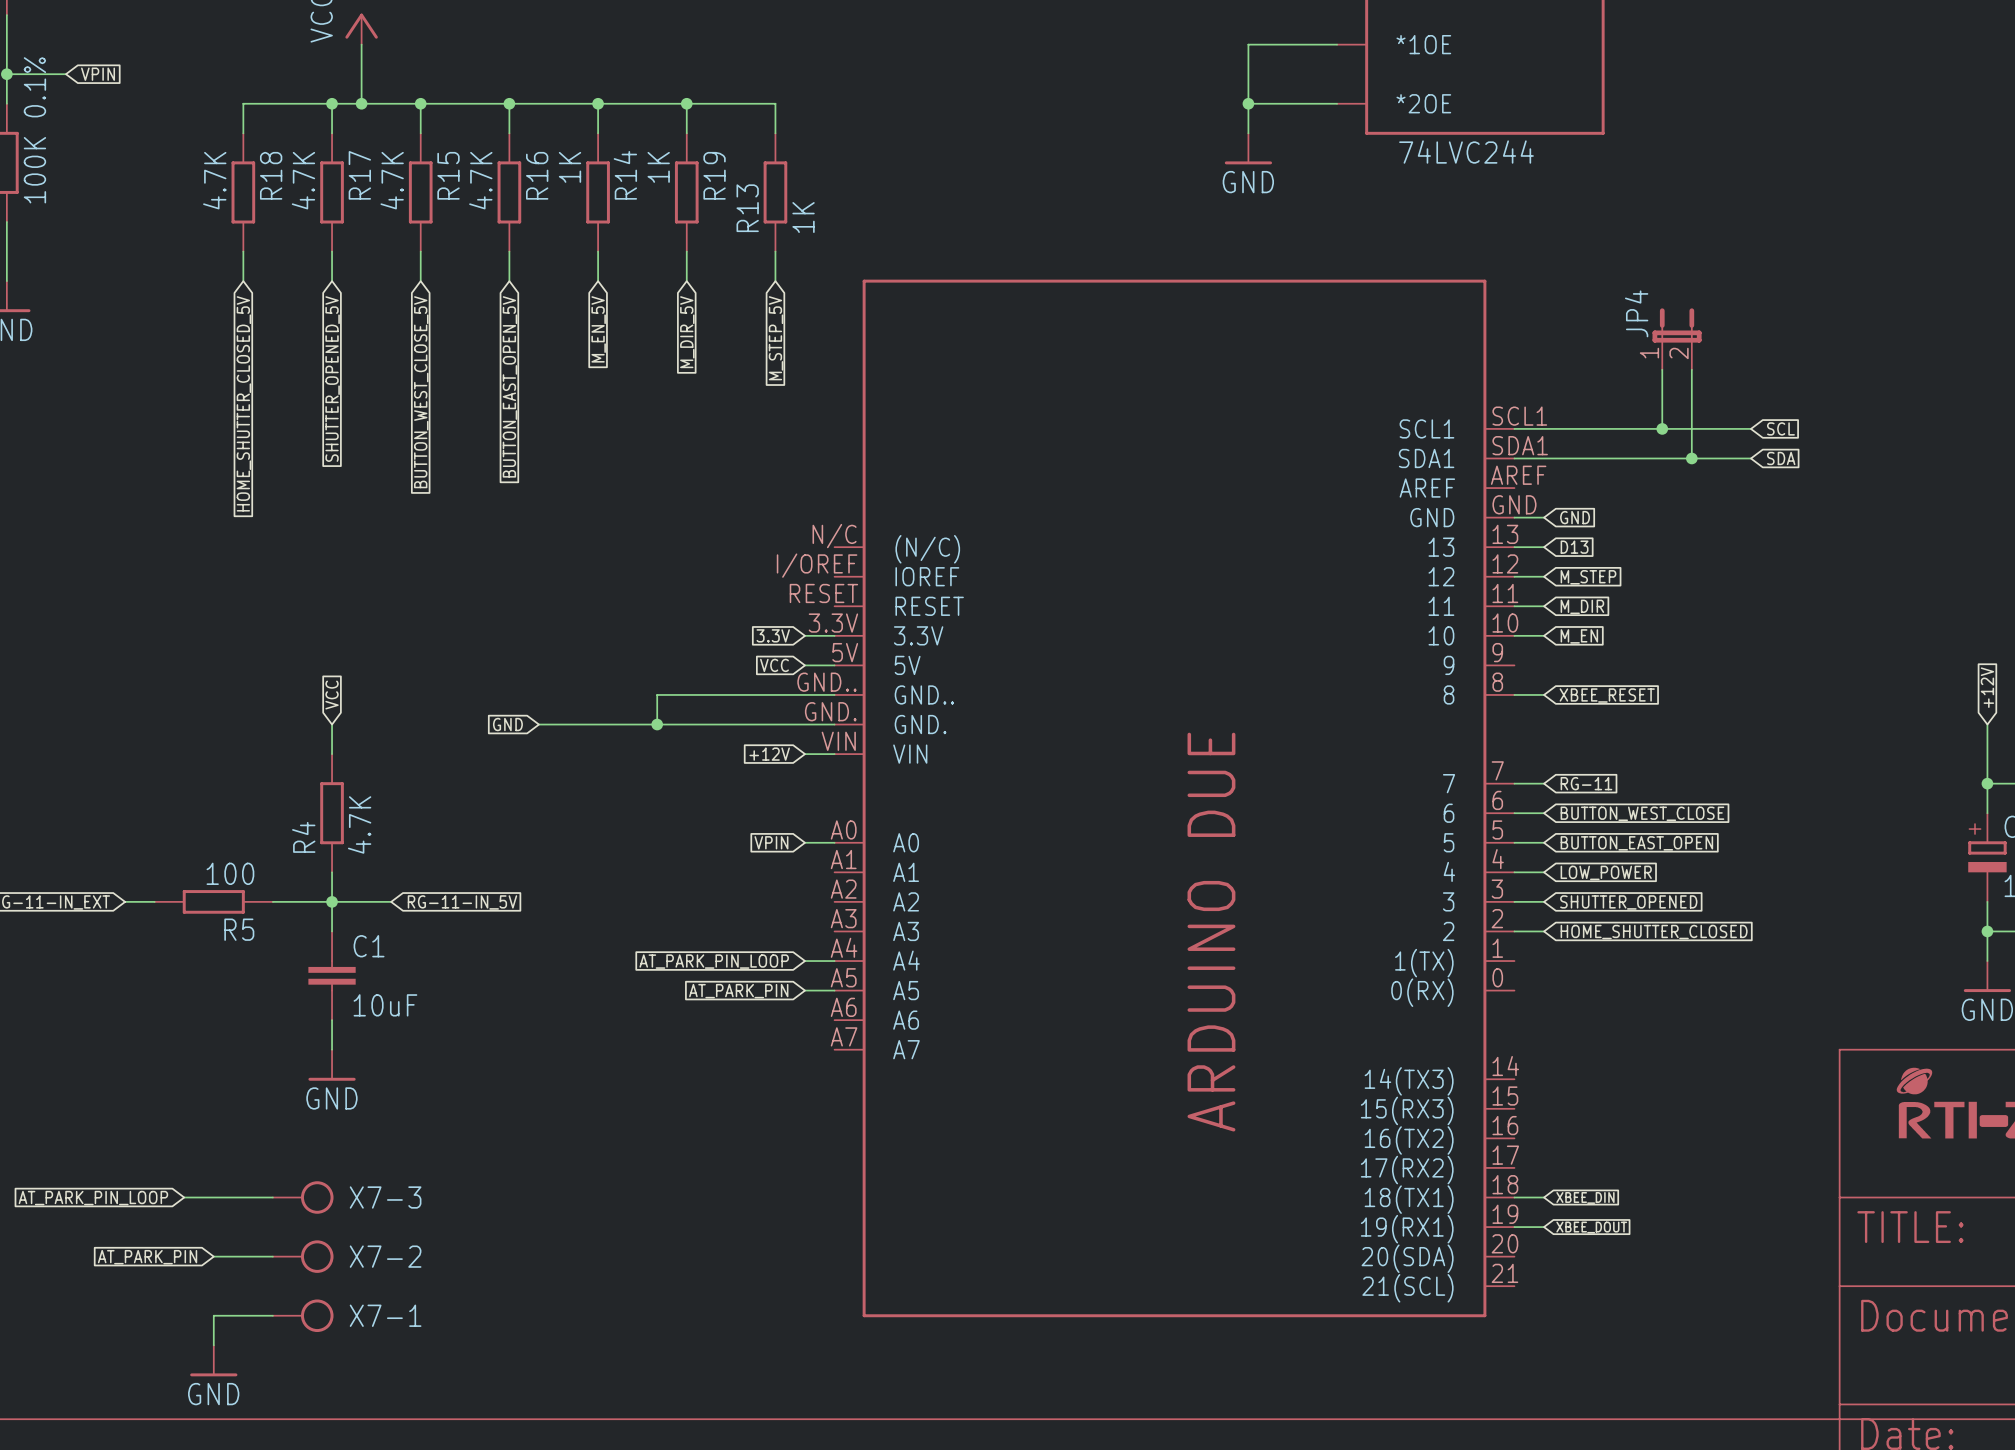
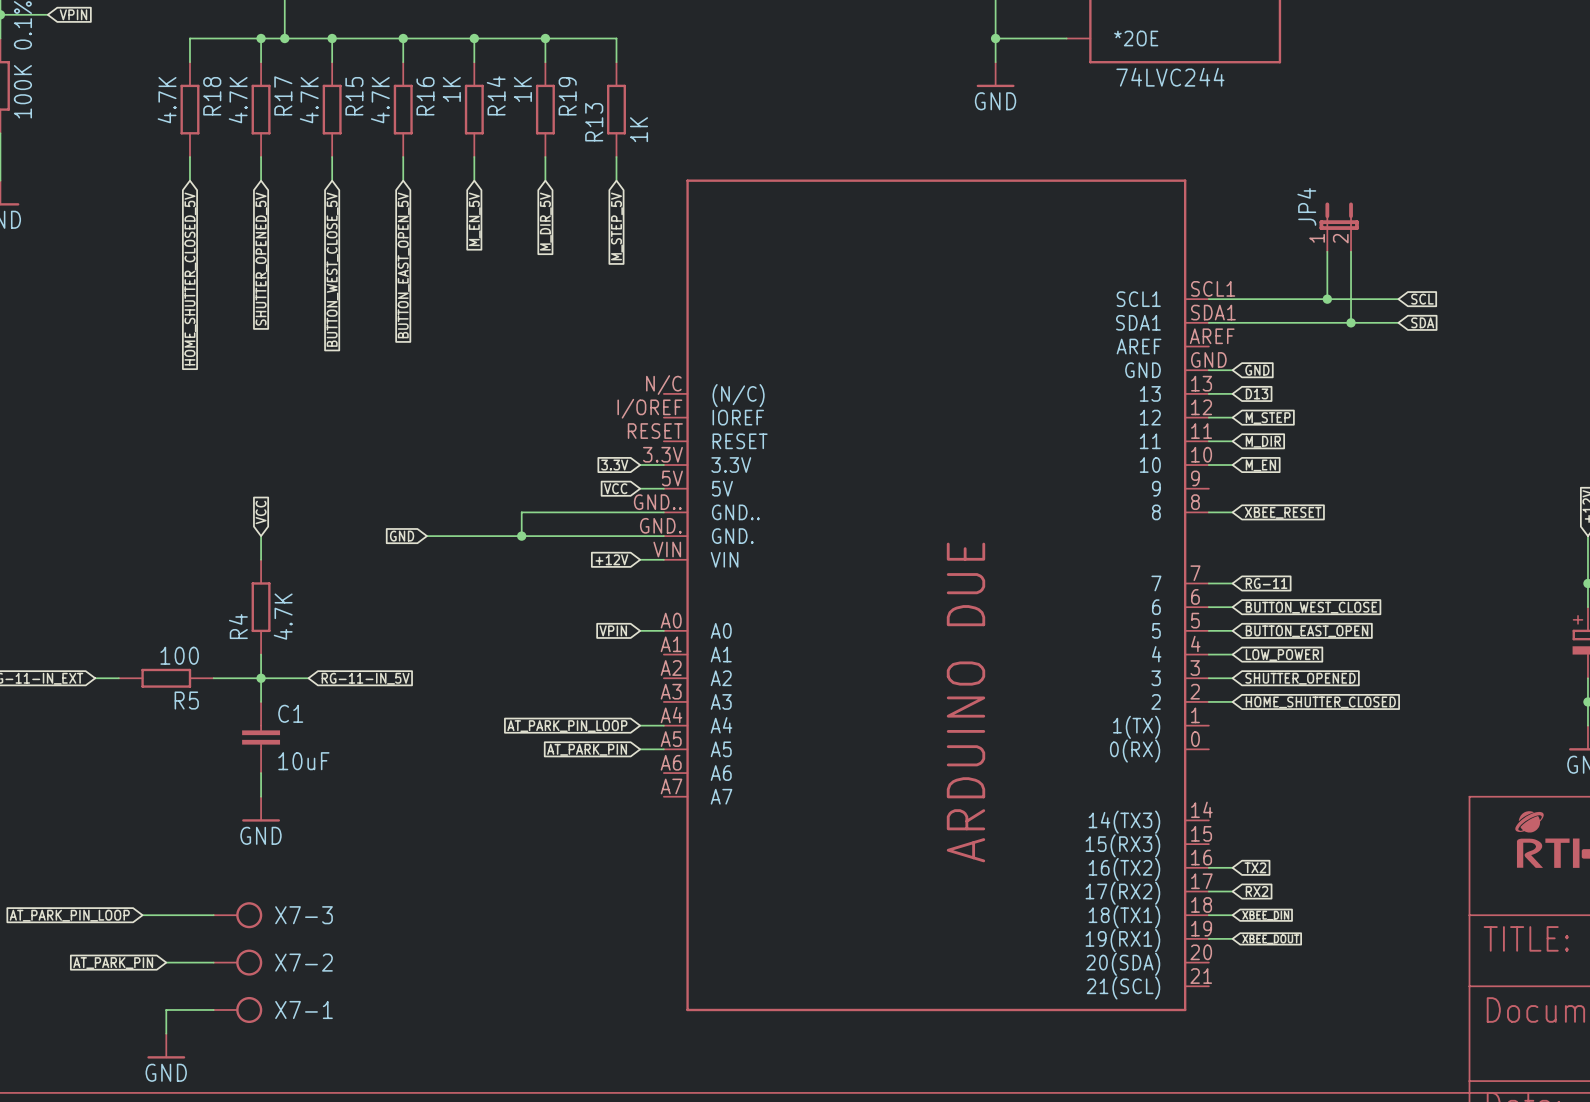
wire: none -> (1208, 867) (1232, 867)
global label: none -> TX2 (1255, 867)
wire: none -> (1208, 891) (1232, 891)
global label: none -> RX2 (1257, 891)

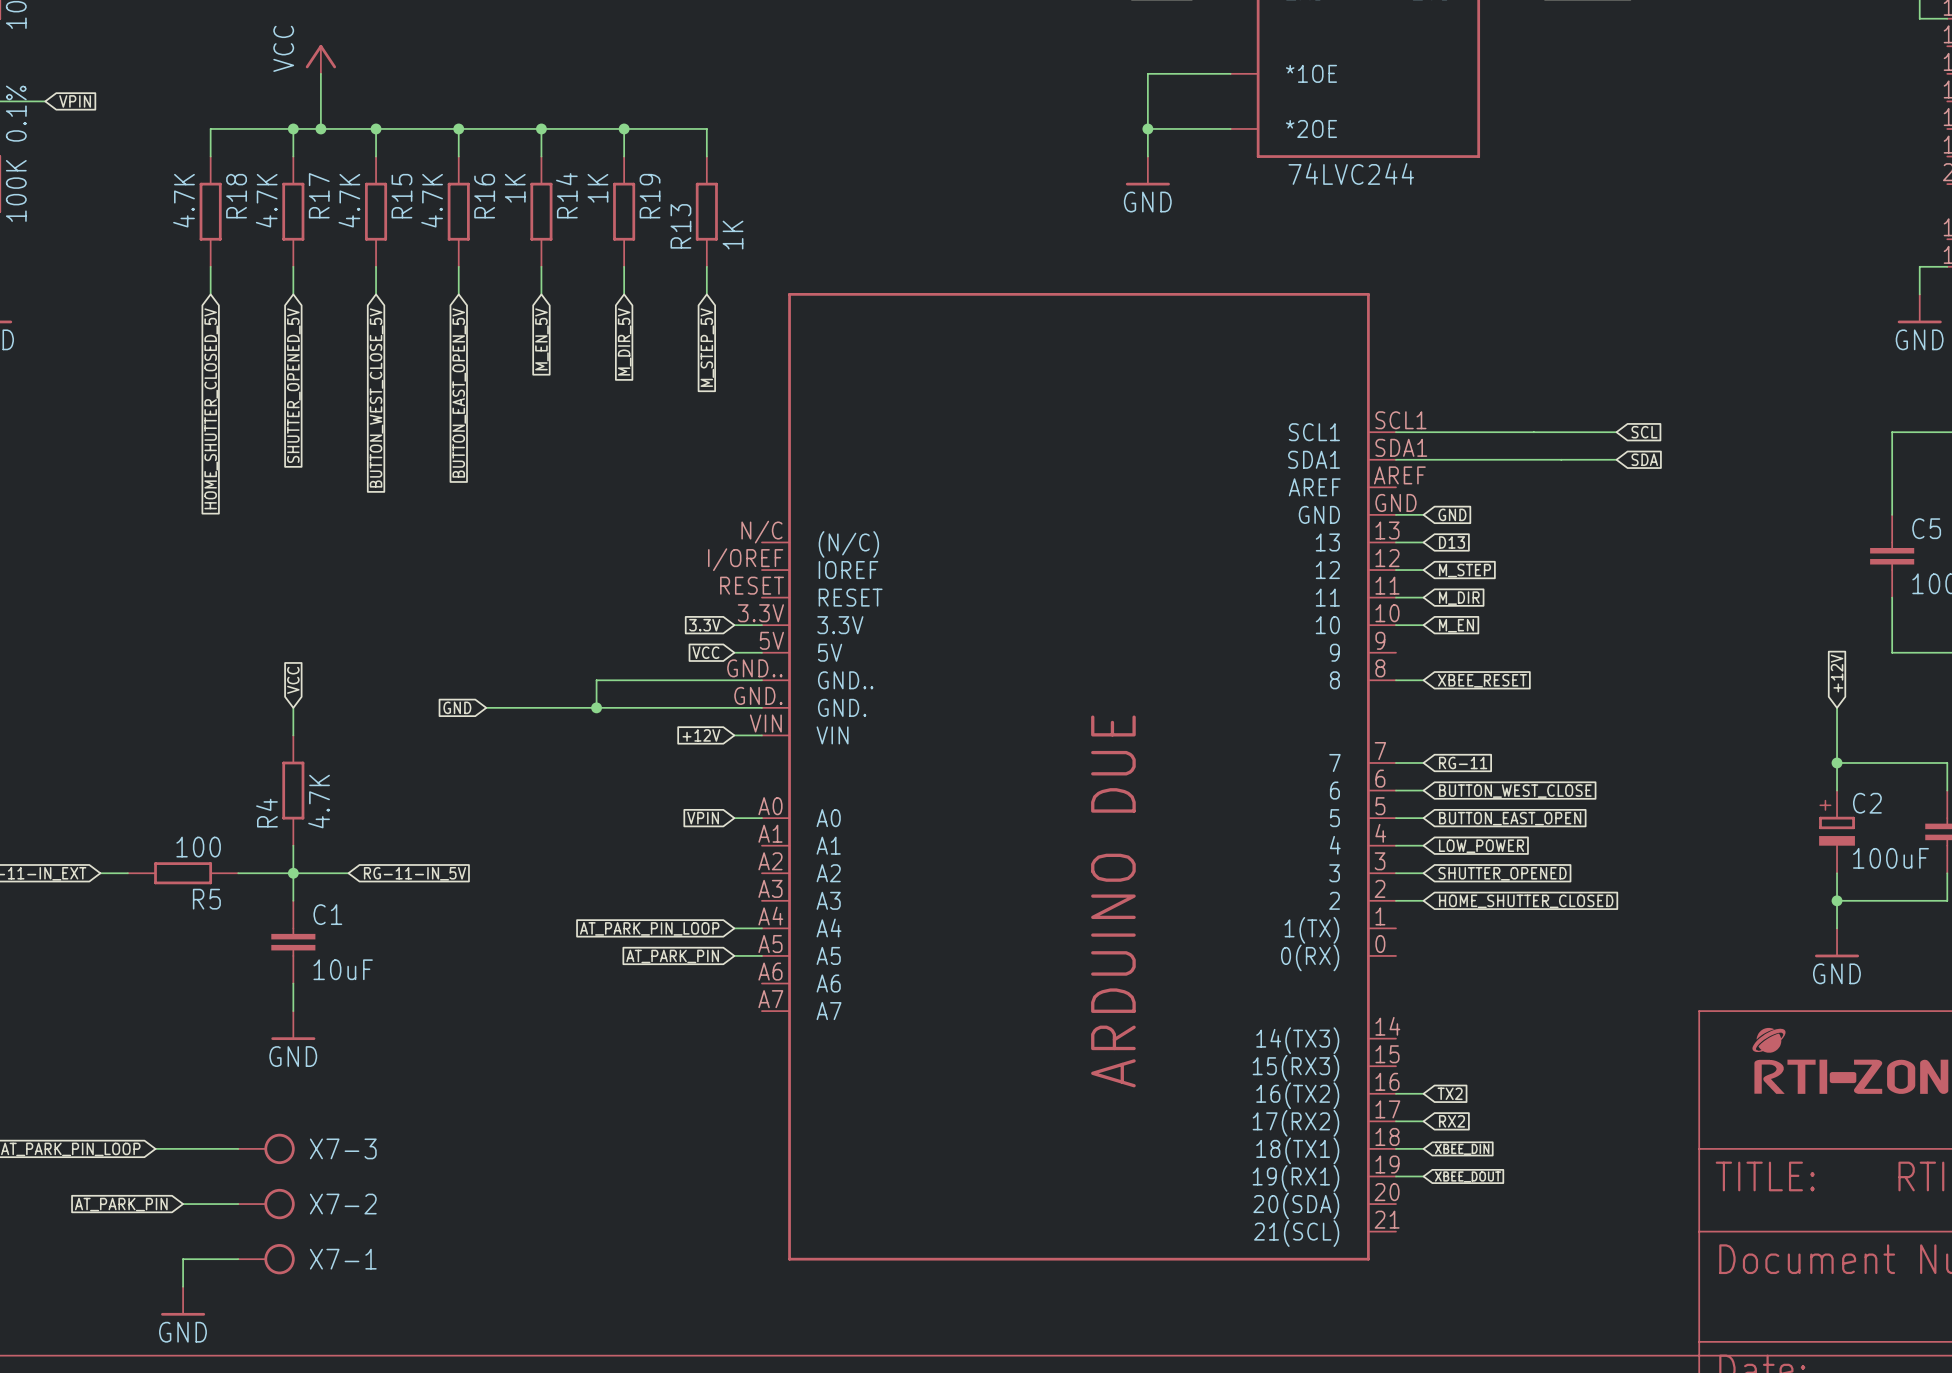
JP4: (1339, 227) -> none
wire: (1327, 251) (1327, 299) -> none
wire: (1351, 251) (1351, 322) -> none
junction: (1327, 299) -> none
junction: (1351, 322) -> none

